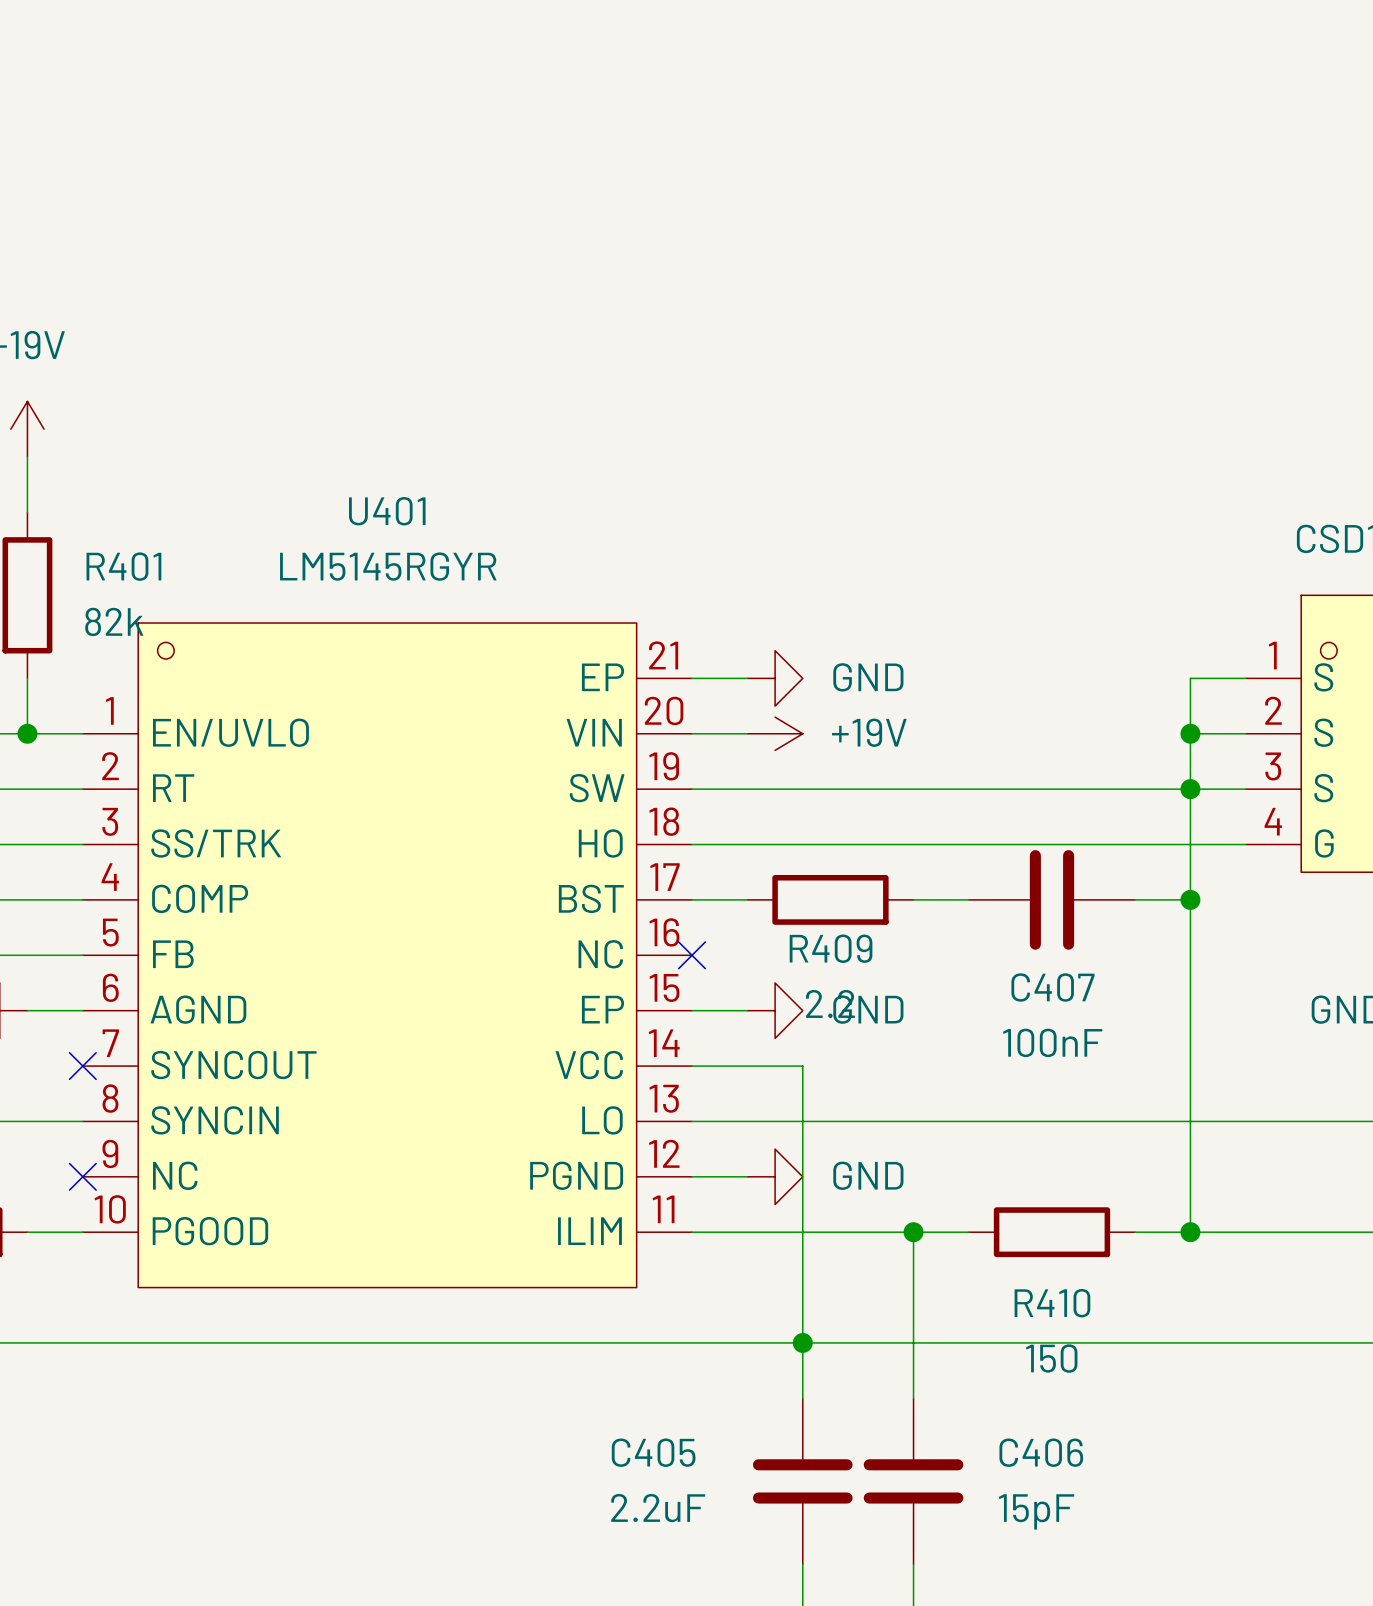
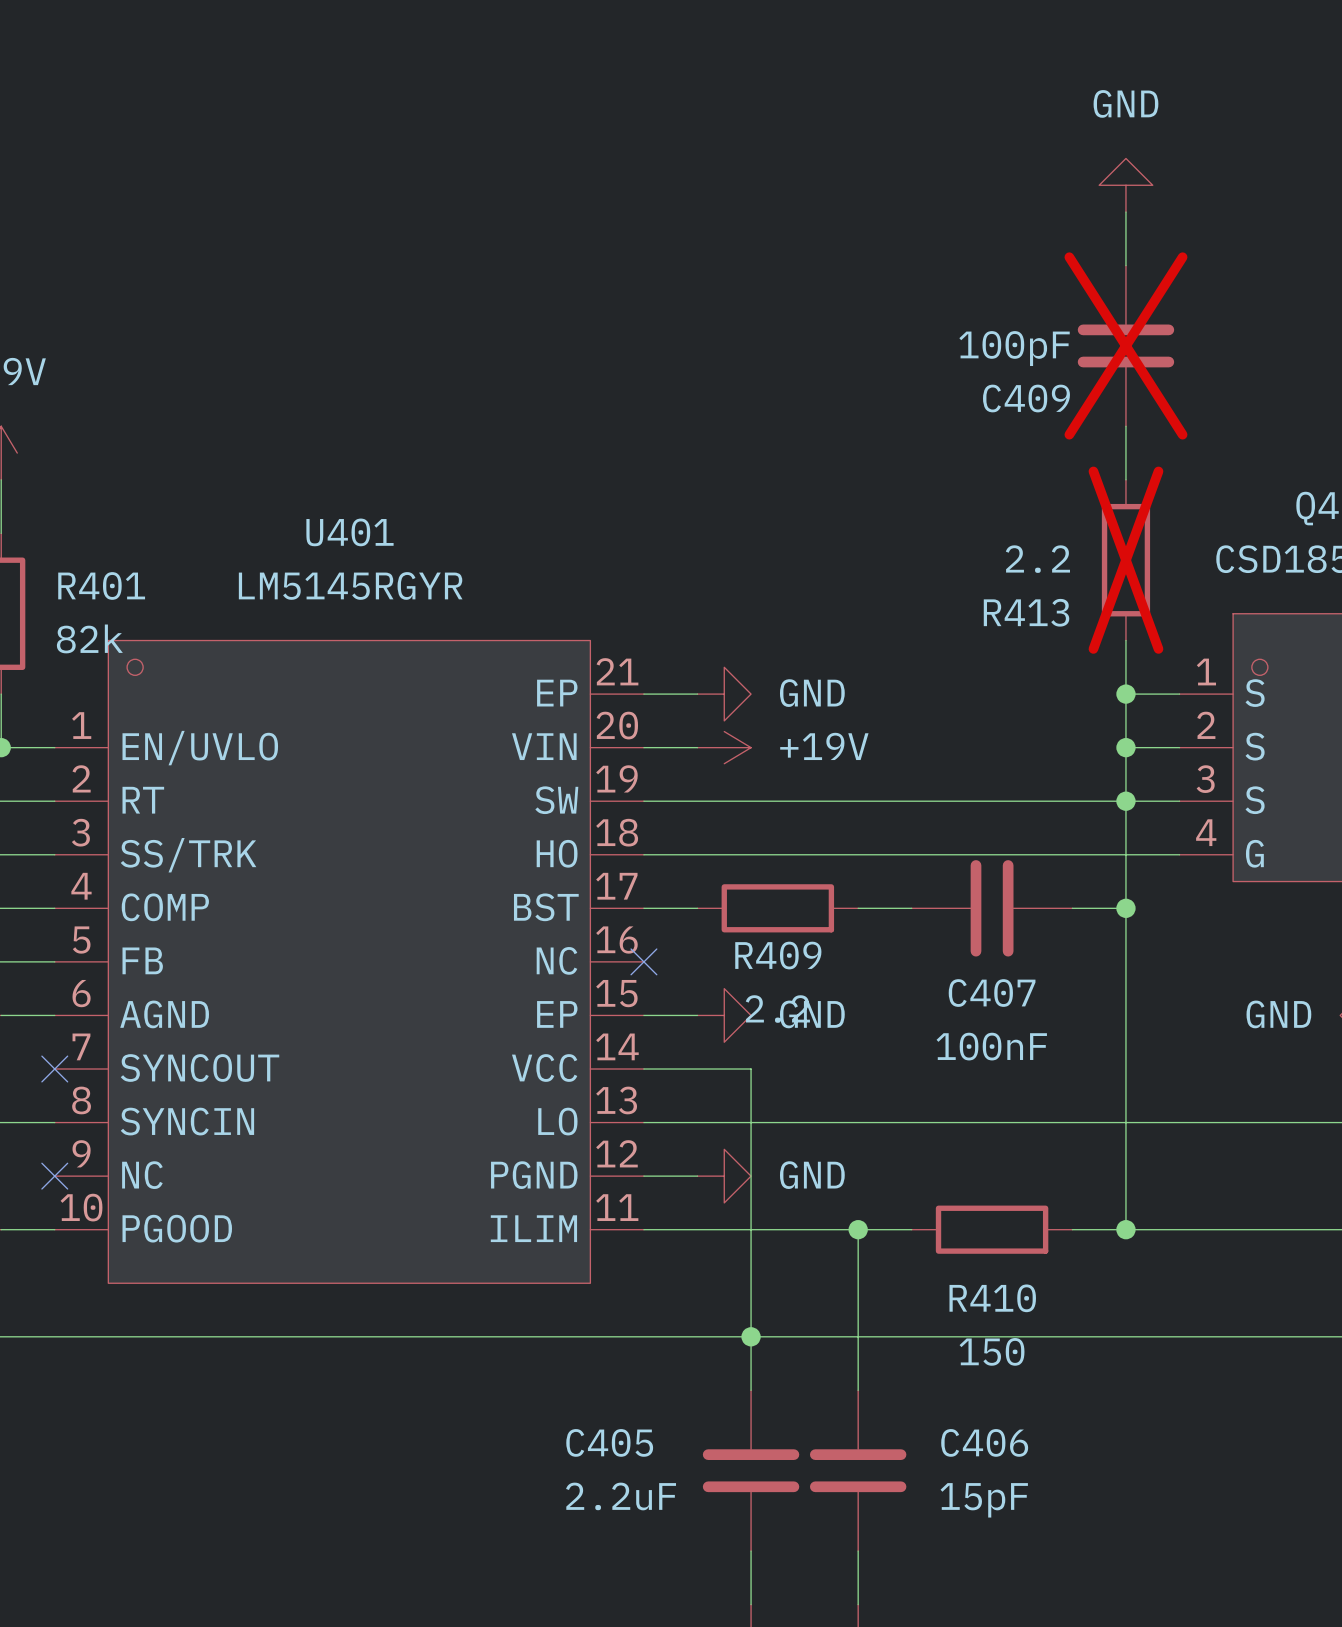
power symbol: none -> GND (1125, 185)
wire: none -> (1125, 212) (1125, 265)
C409: none -> 100pF (1125, 345)
wire: none -> (1125, 426) (1125, 479)
R413: none -> 2.2 (1125, 560)
wire: none -> (1125, 640) (1125, 694)
junction: none -> (1125, 694)

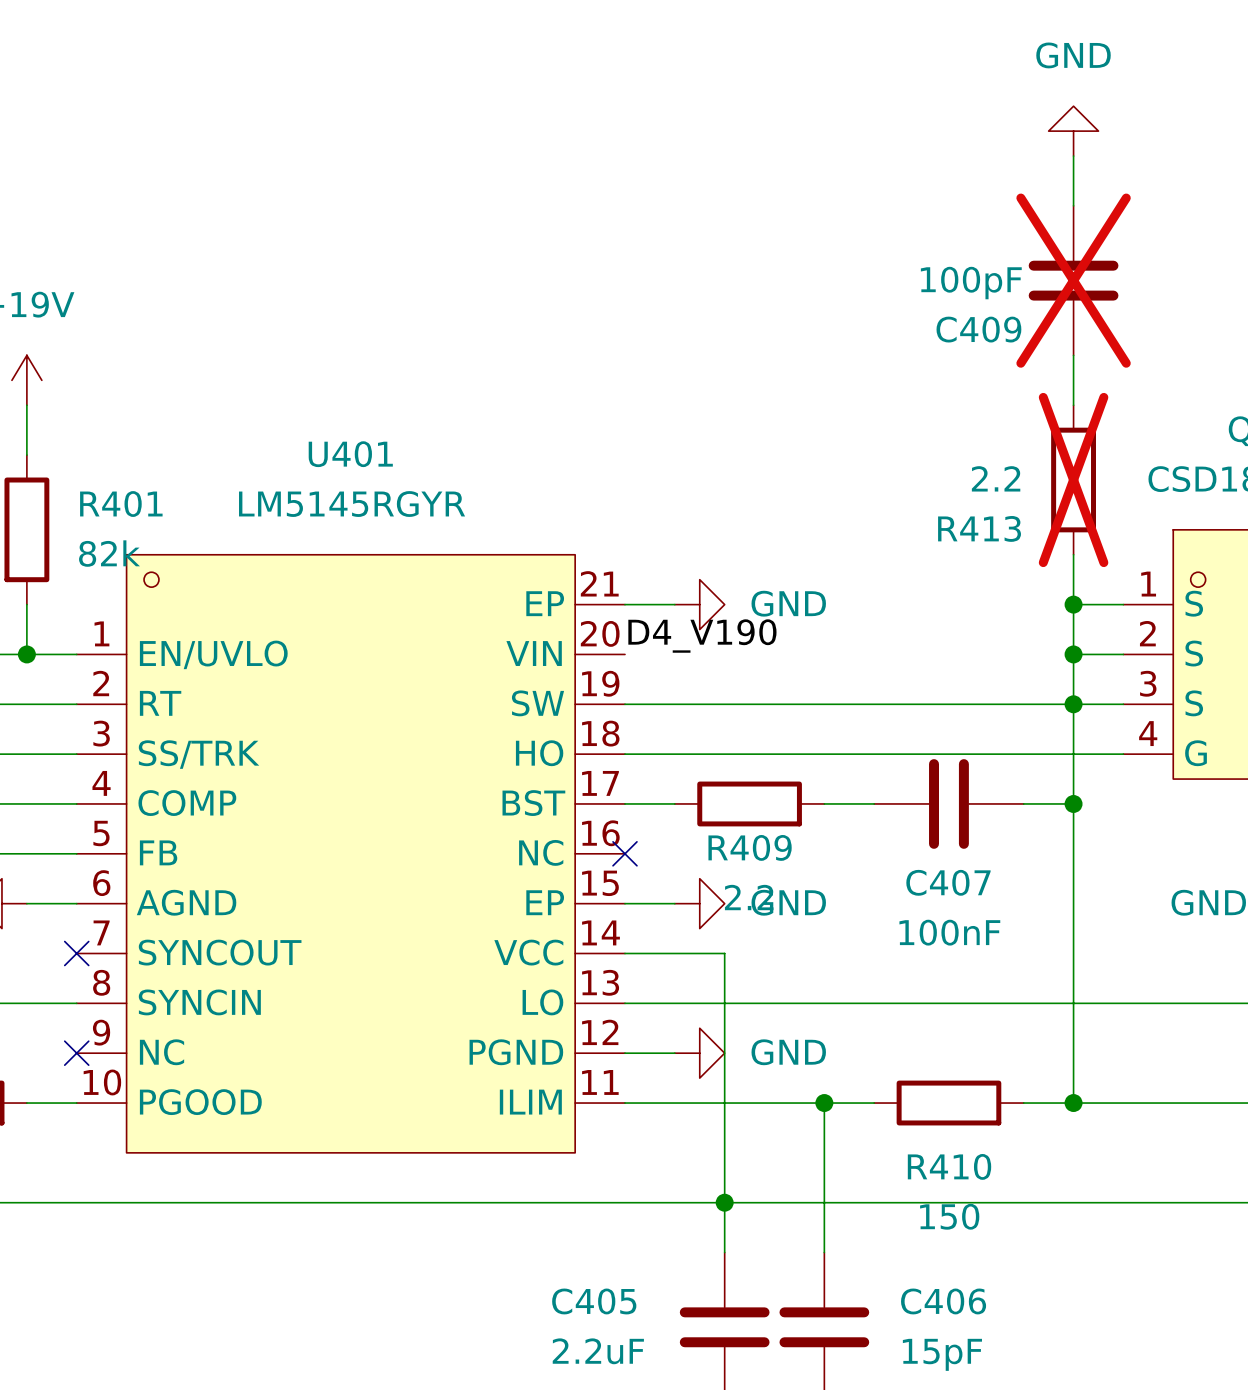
label: none -> D4_V190 (702, 636)
wire: (643, 747) (697, 747) -> none
power symbol: +19V (724, 747) -> none

